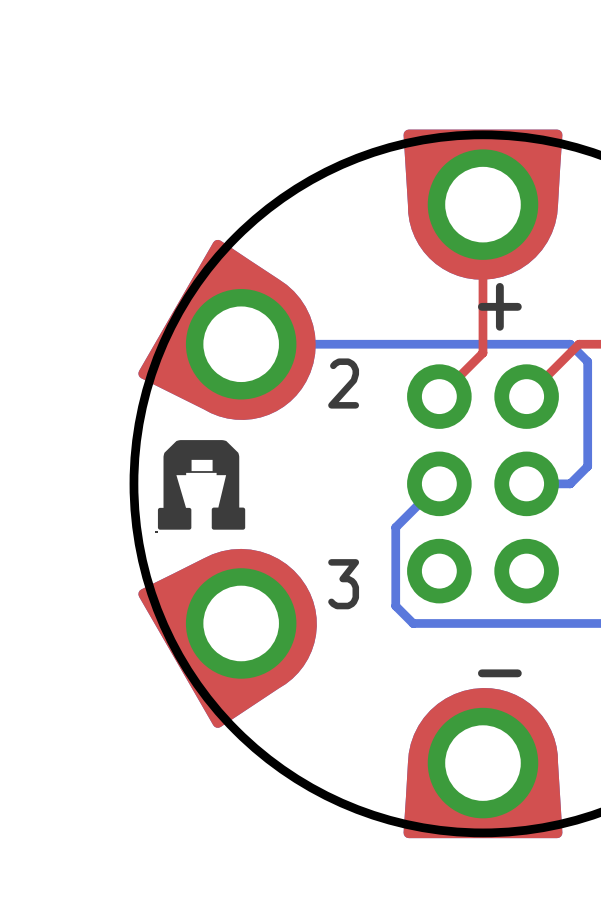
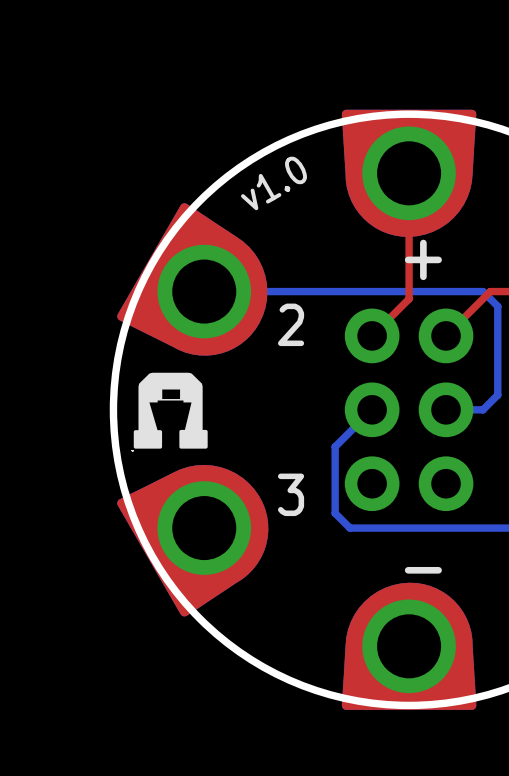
text: none -> v1.0 (274, 183)

